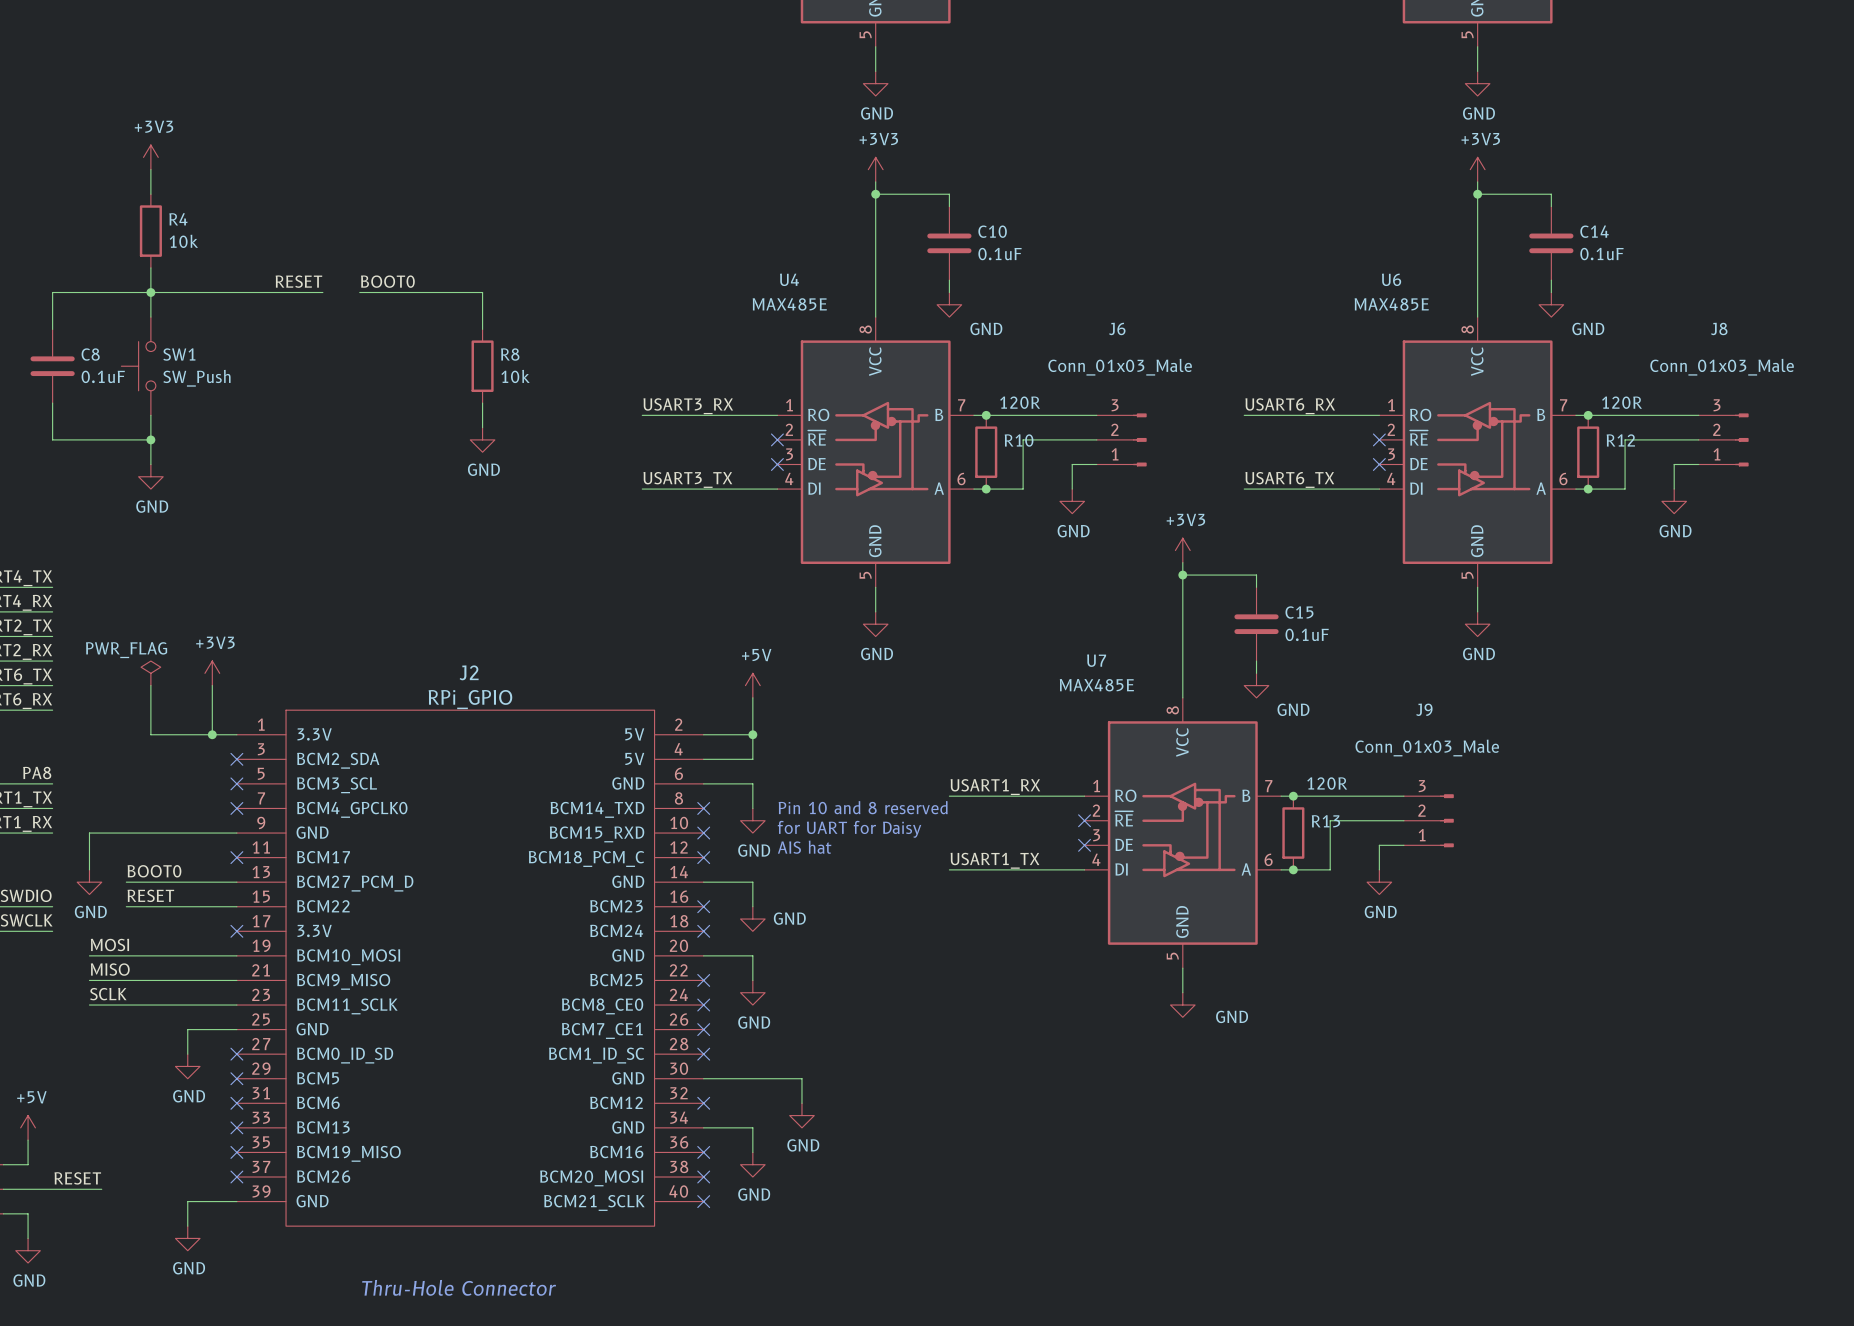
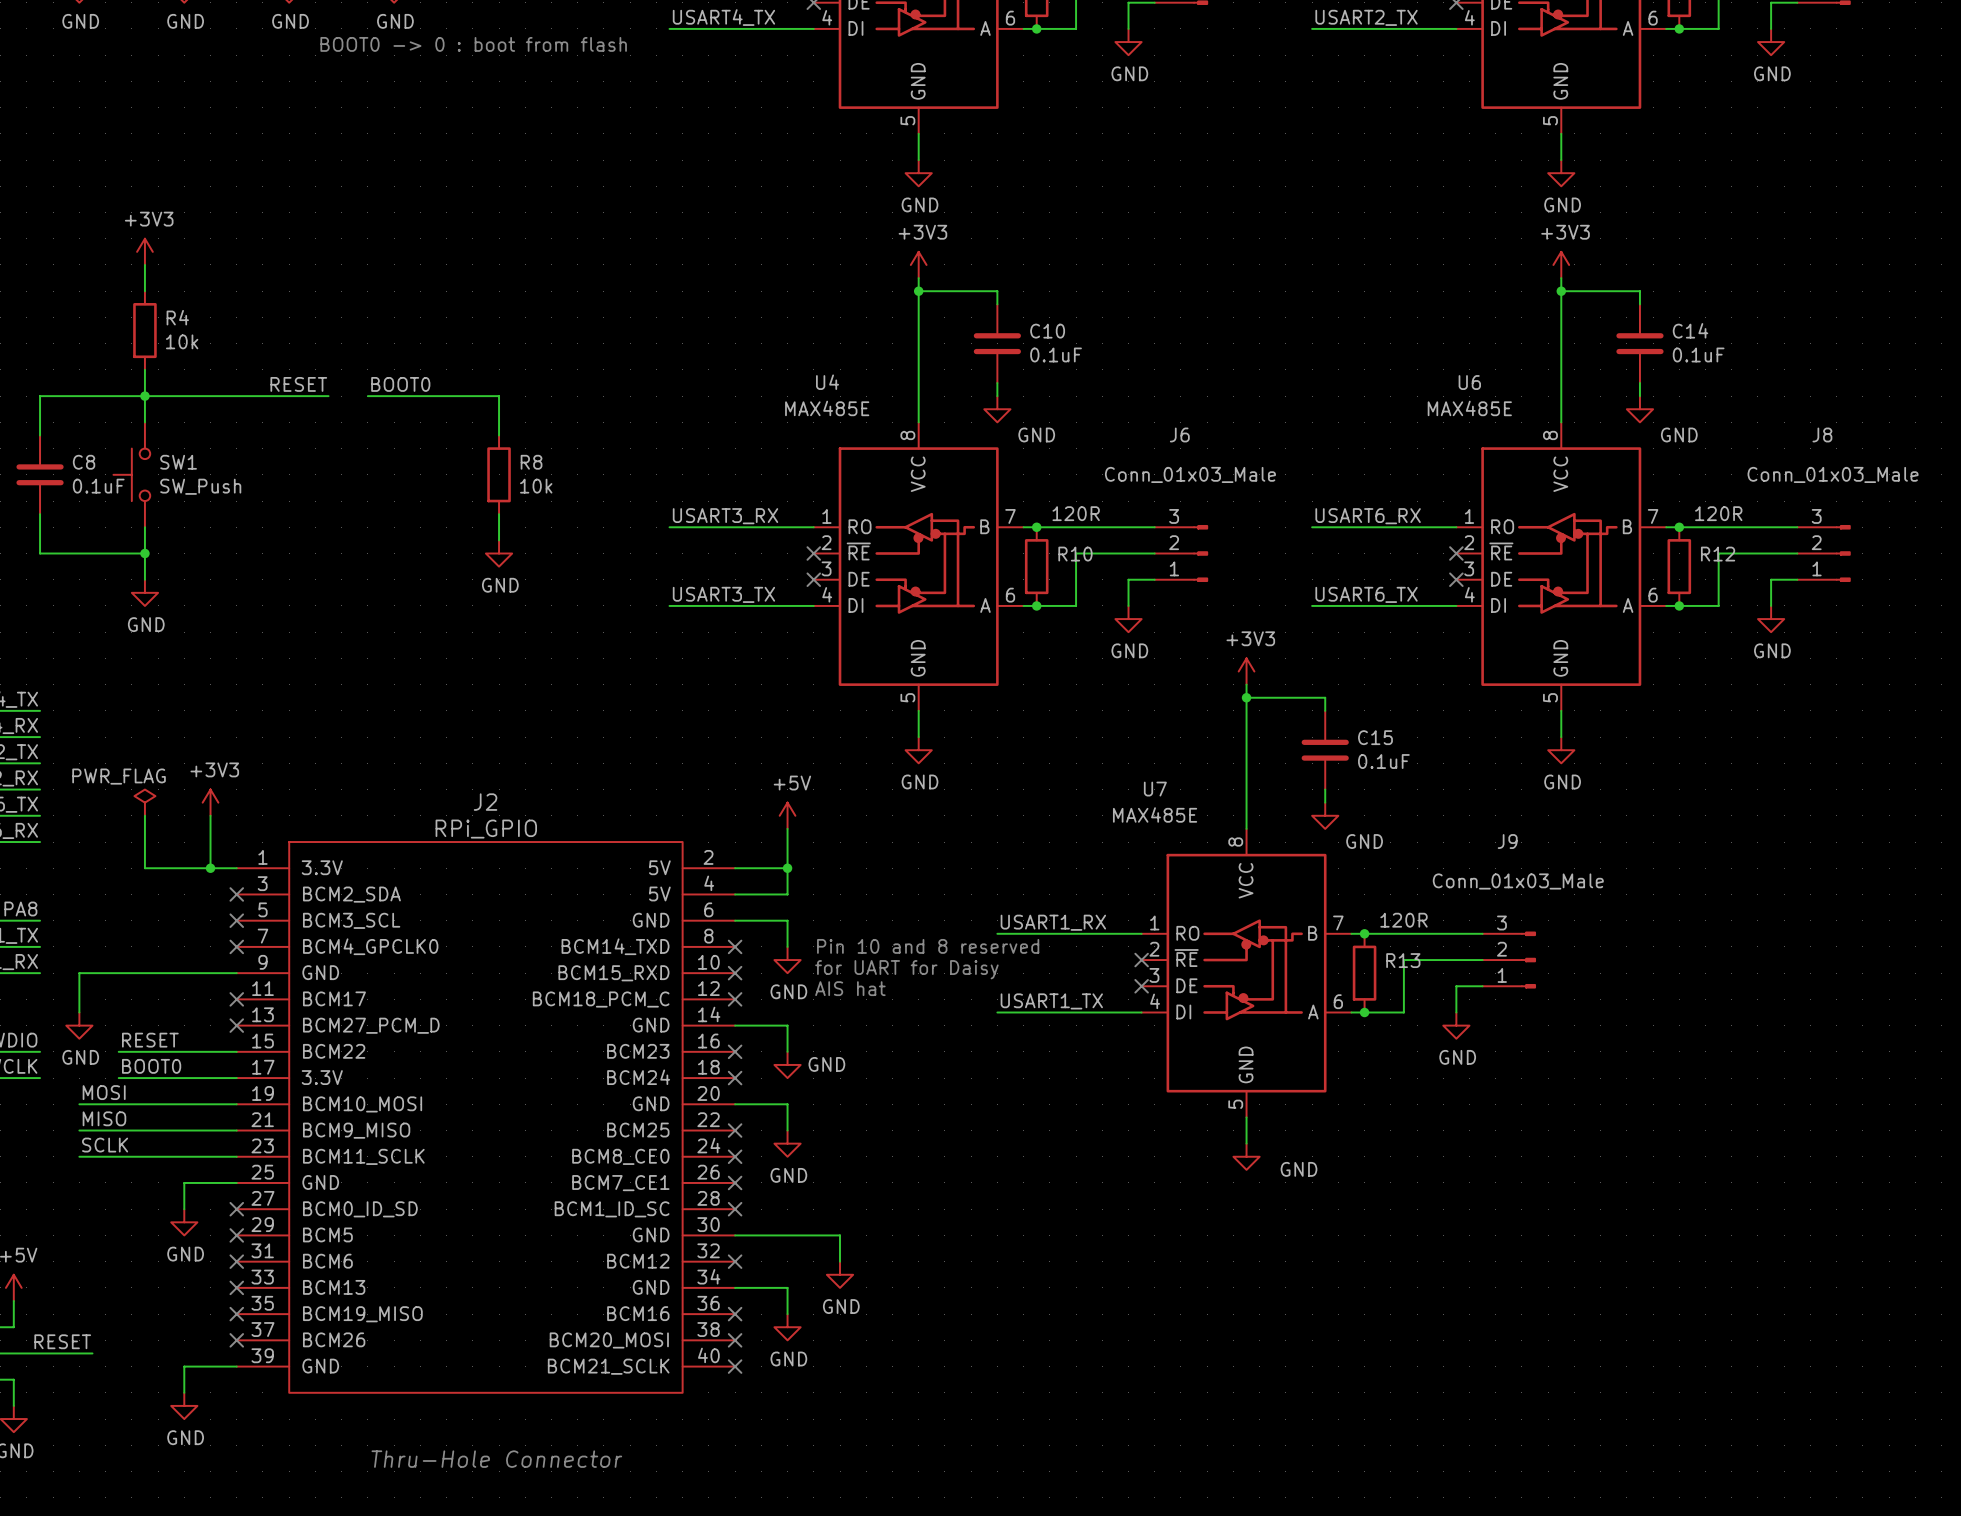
label position: BOOT0 (154, 871) -> BOOT0 (151, 1066)
wire: (126, 882) (236, 882) -> (118, 1078) (236, 1078)
no-connect mark position: (236, 931) -> (236, 1025)

